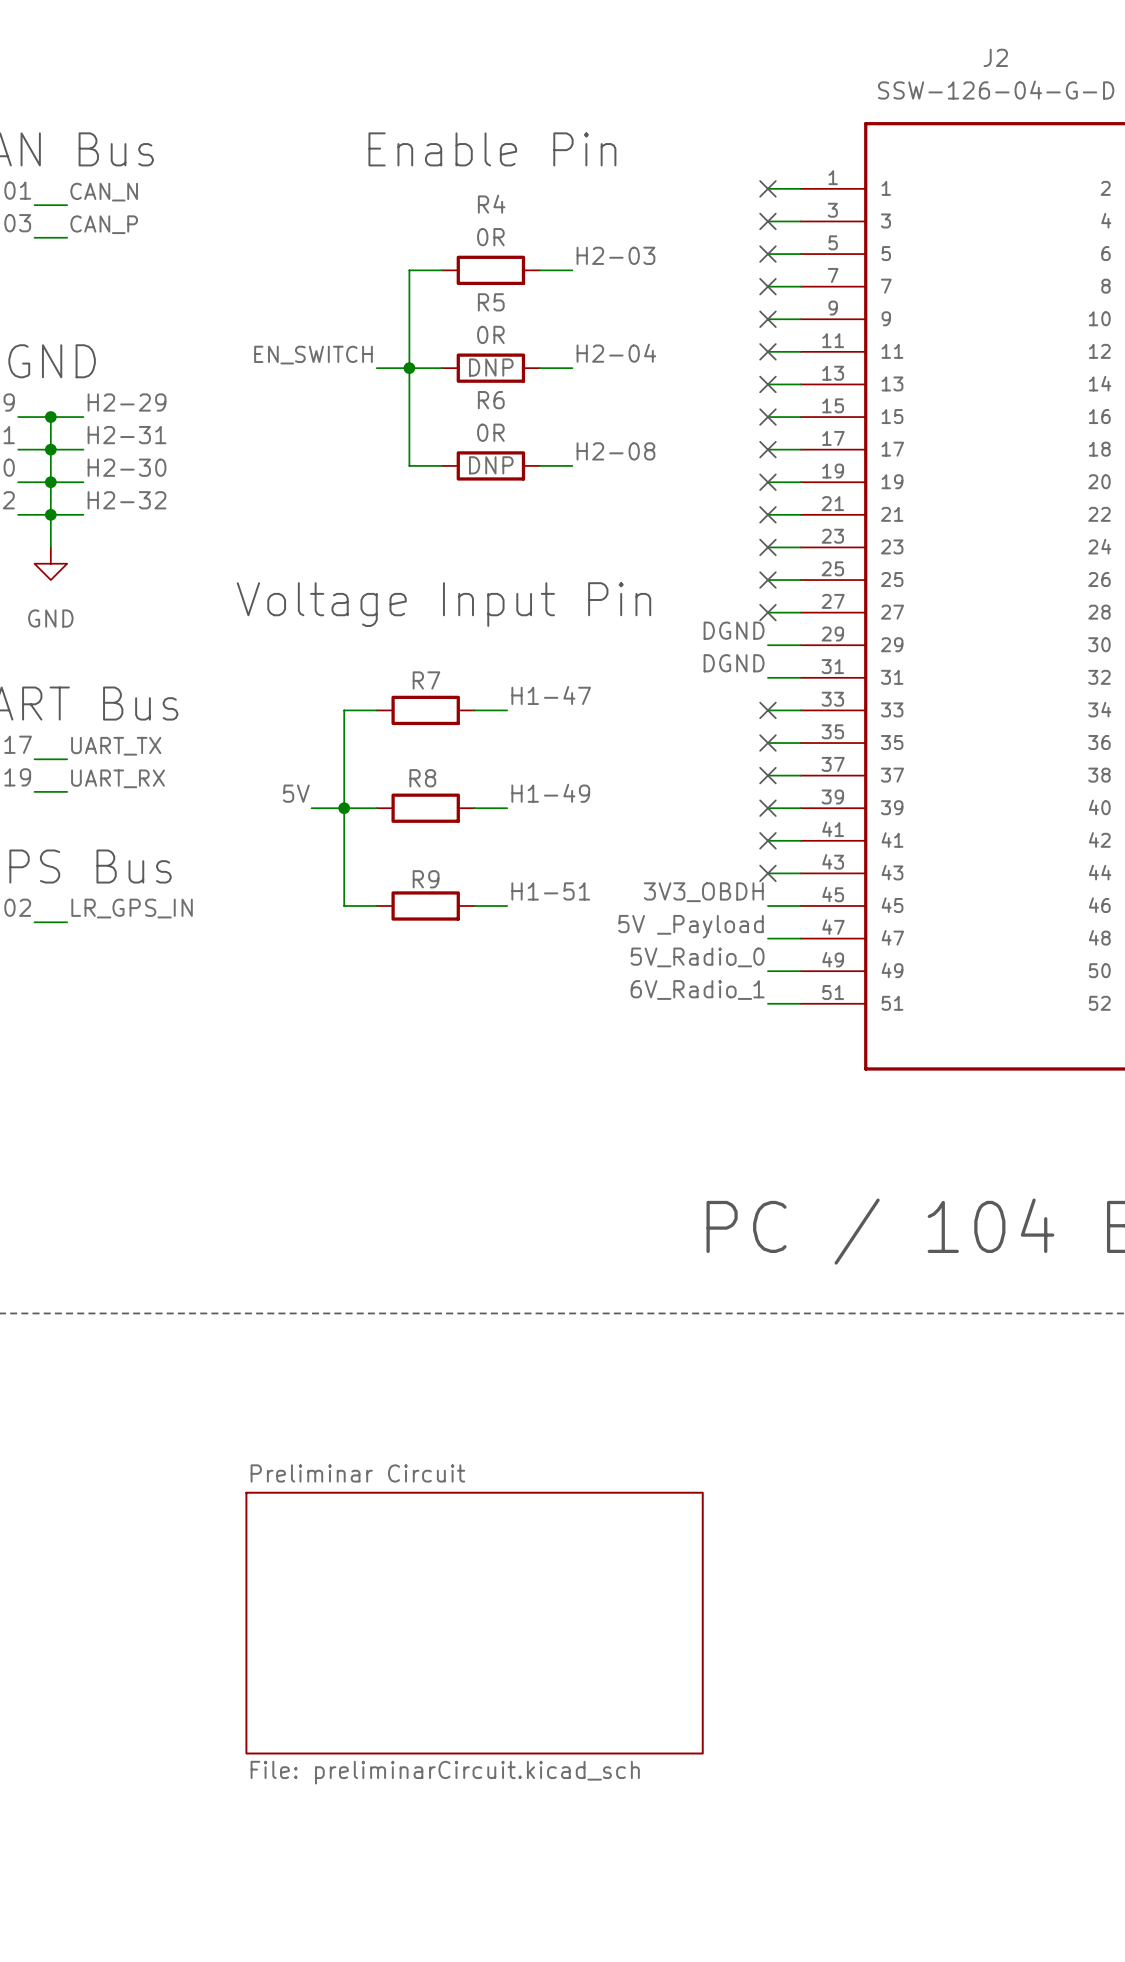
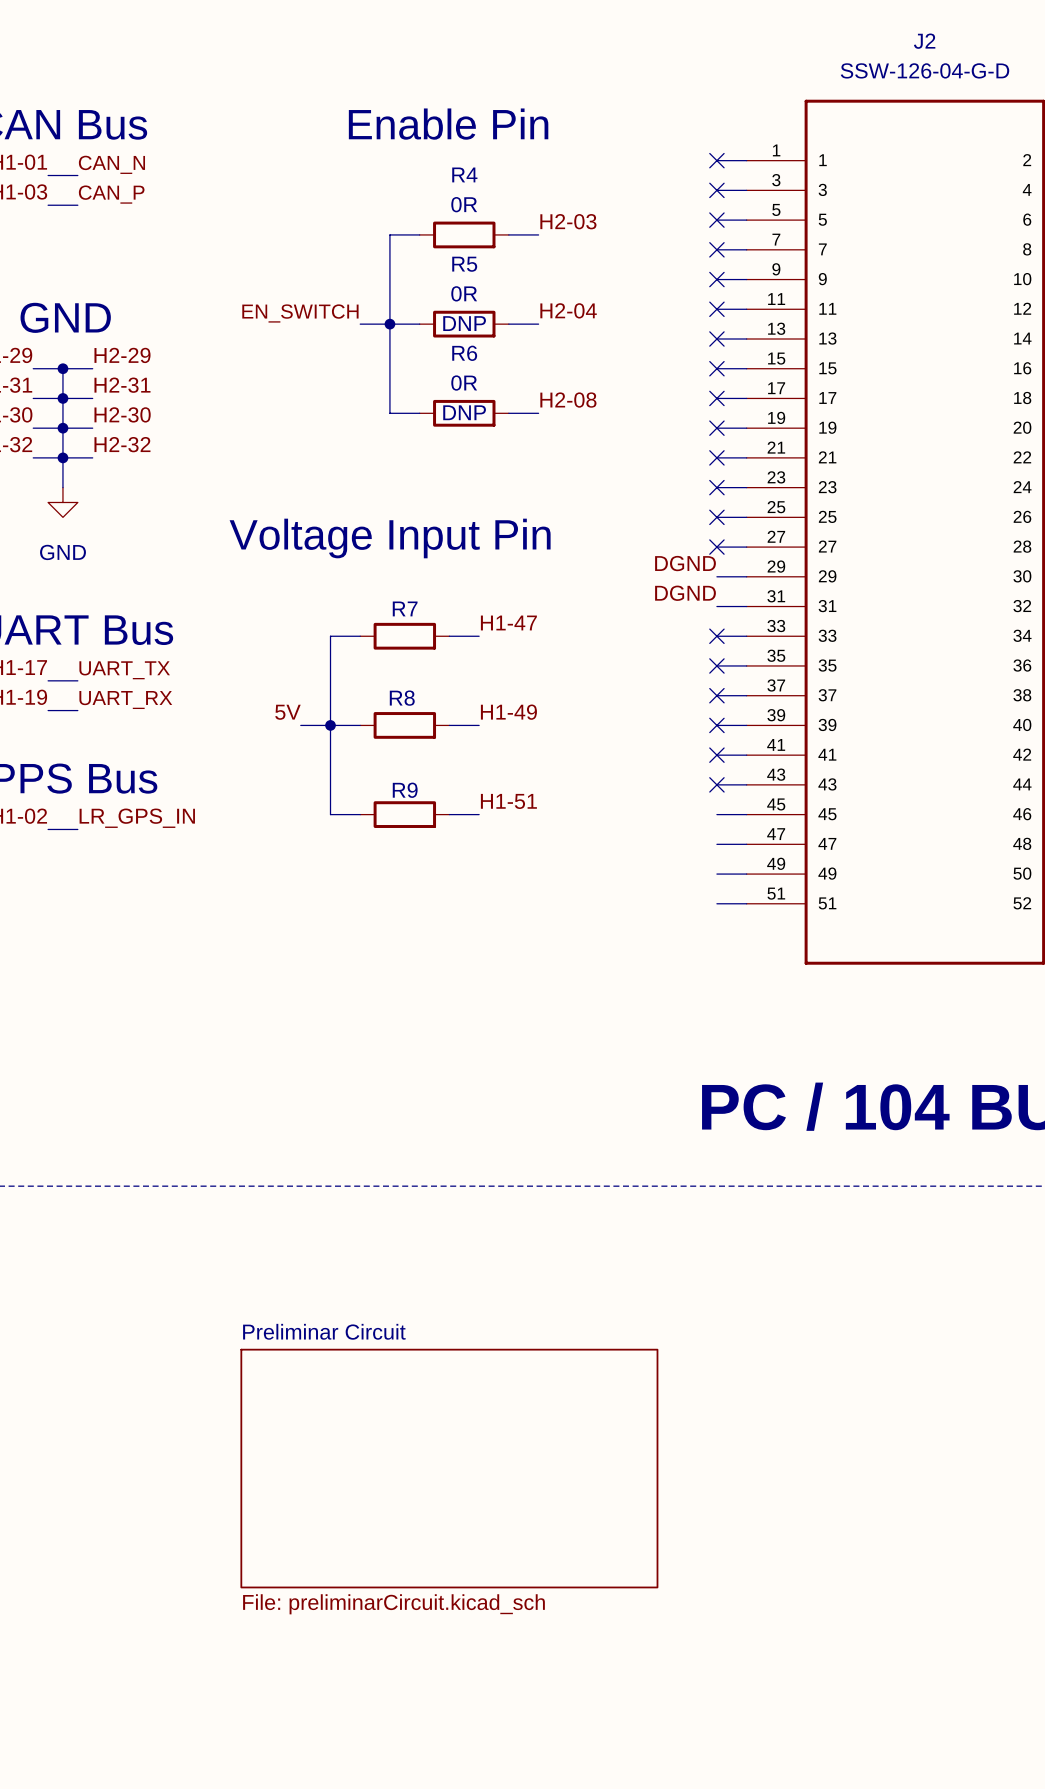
label: 3V3_OBDH (703, 892) -> none
label: 5V _Payload (691, 926) -> none
label: 5V_Radio_0 (697, 957) -> none
label: 6V_Radio_1 (697, 990) -> none

